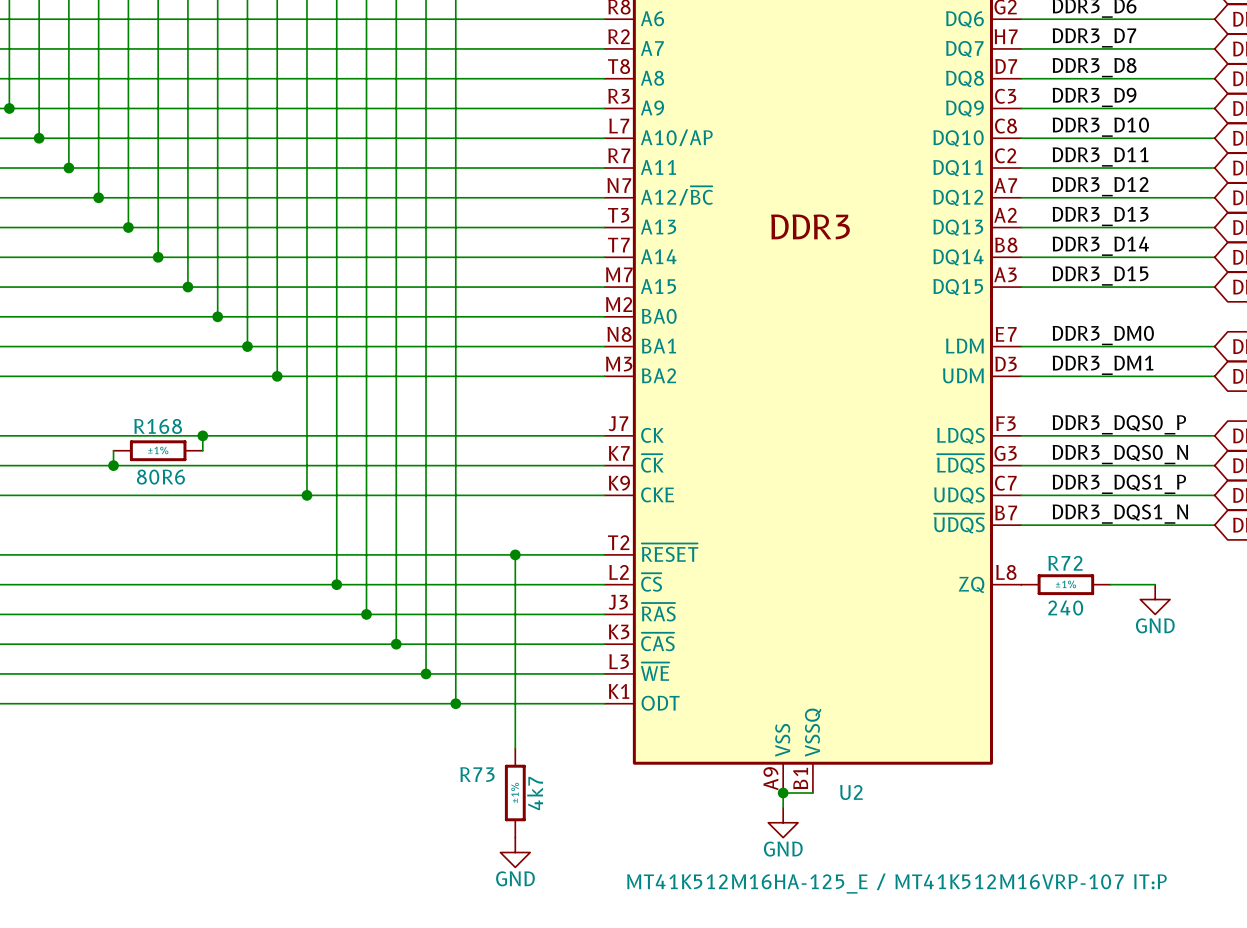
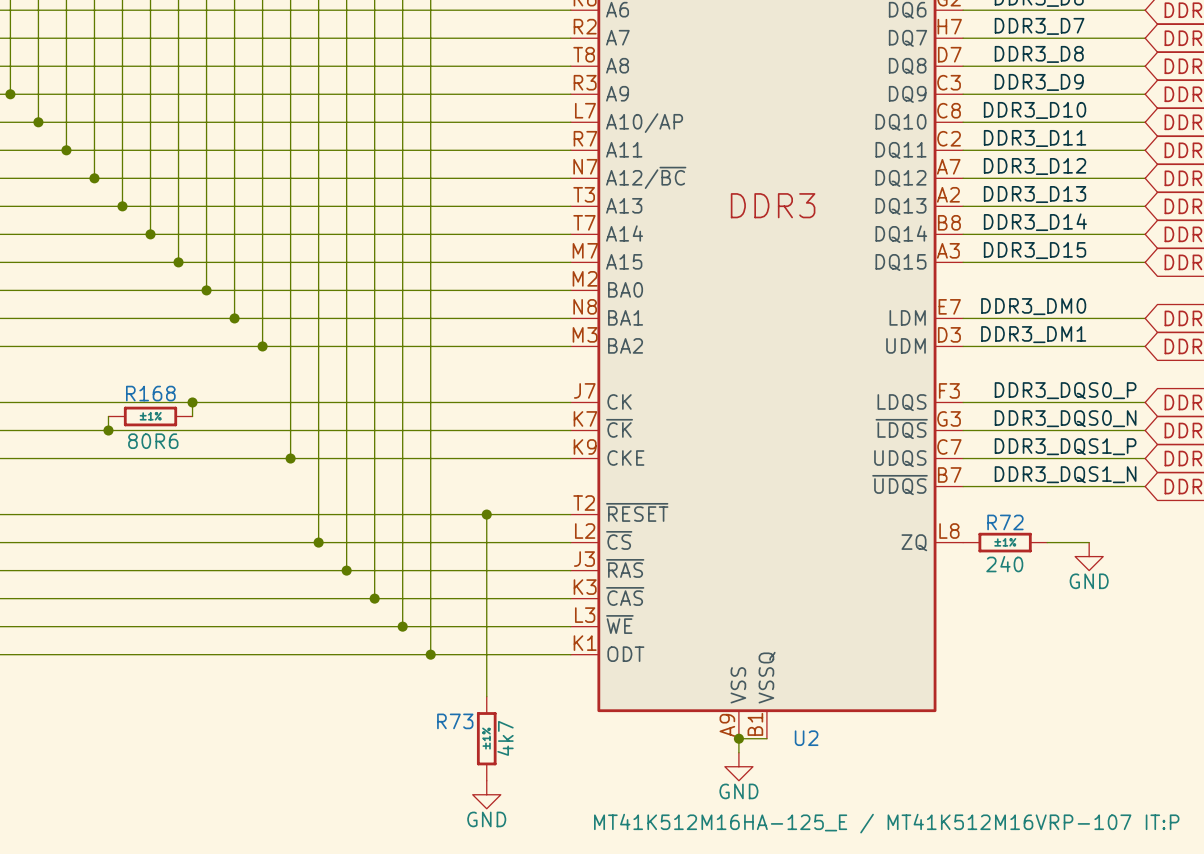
label position: DDR3_D10 (1100, 127) -> DDR3_D10 (1035, 110)
label position: DDR3_D11 (1100, 156) -> DDR3_D11 (1035, 138)
label position: DDR3_D12 (1100, 186) -> DDR3_D12 (1035, 166)
label position: DDR3_D13 (1100, 216) -> DDR3_D13 (1035, 194)
label position: DDR3_D14 (1100, 246) -> DDR3_D14 (1035, 222)
label position: DDR3_D15 (1100, 276) -> DDR3_D15 (1035, 250)
label position: DDR3_DM0 (1103, 335) -> DDR3_DM0 (1033, 306)
label position: DDR3_DM1 (1103, 365) -> DDR3_DM1 (1033, 334)

